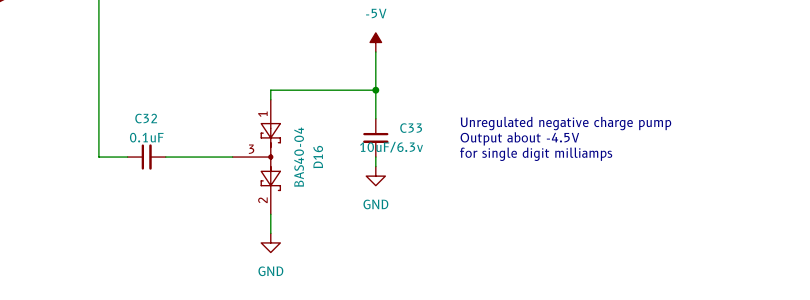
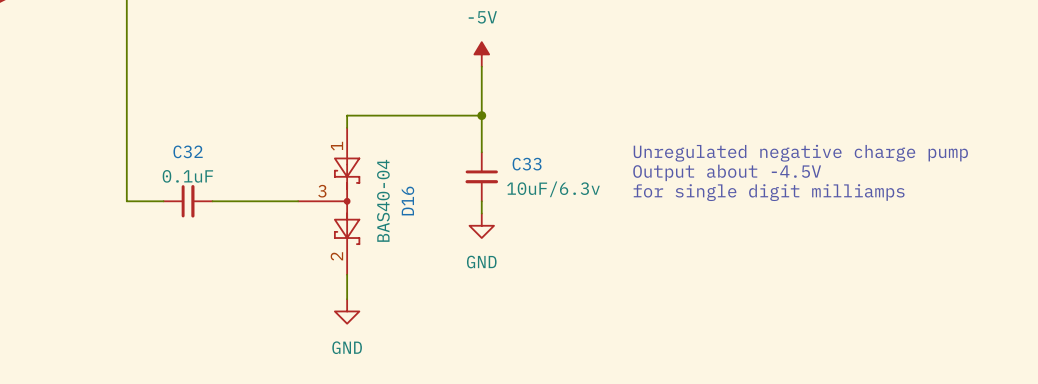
text position: Unregulated negative charge pump (565, 123) -> Unregulated negative charge pump (800, 153)
text position: Output about -4.5V (519, 138) -> Output about -4.5V (727, 172)
C33 value position: 10uF/6.3v (391, 147) -> 10uF/6.3v (553, 189)
text position: for single digit milliamps (536, 154) -> for single digit milliamps (769, 192)

